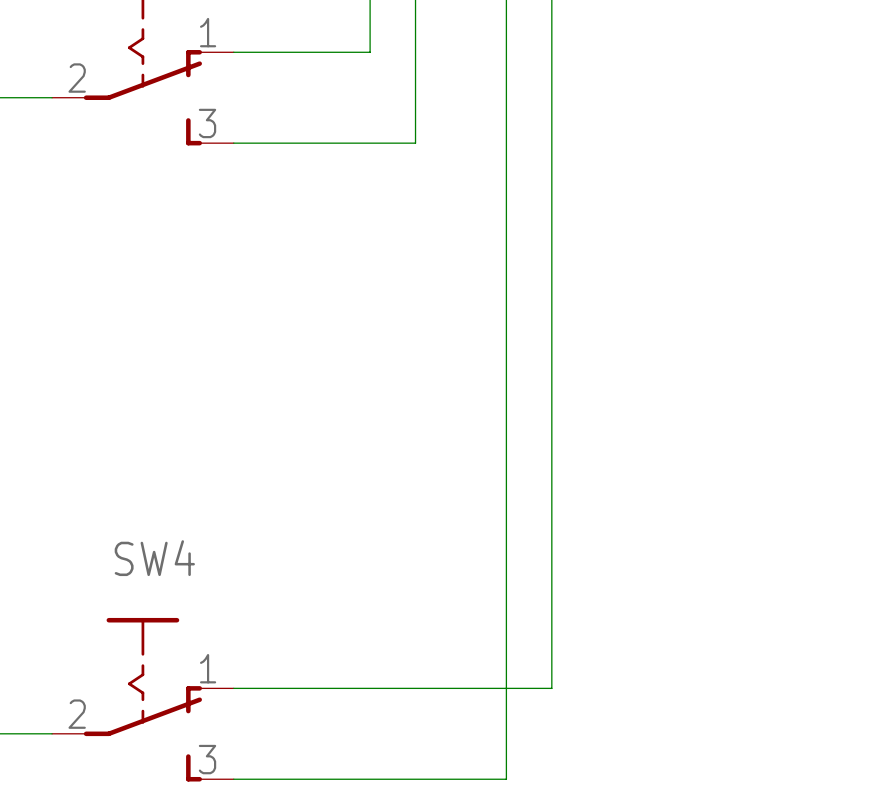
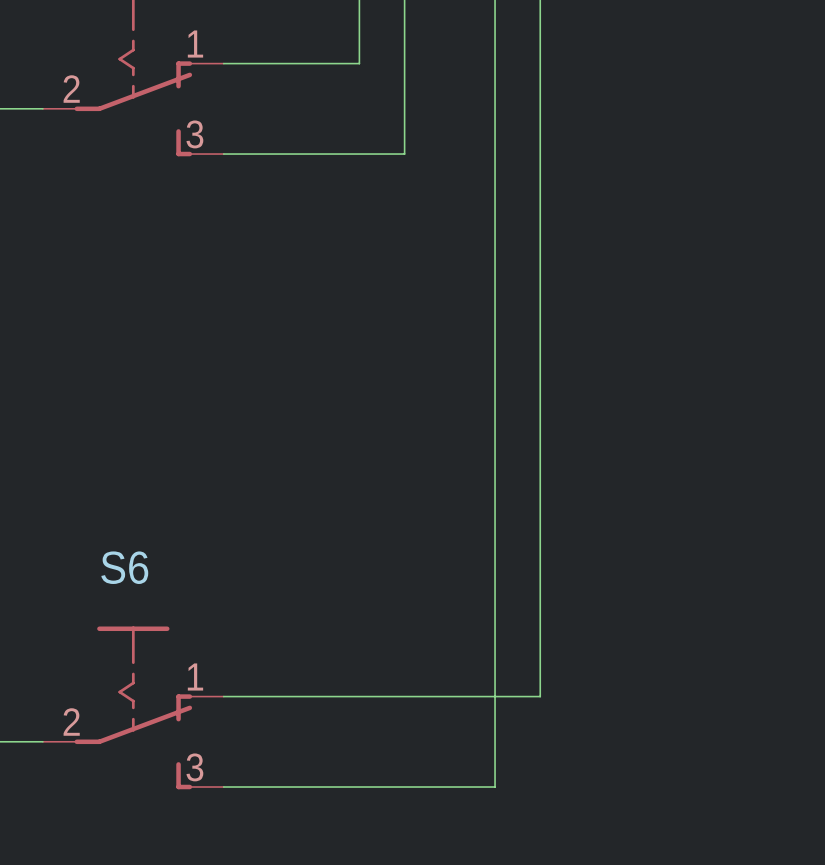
SW4 name: SW4 (154, 558) -> S6 (124, 567)

